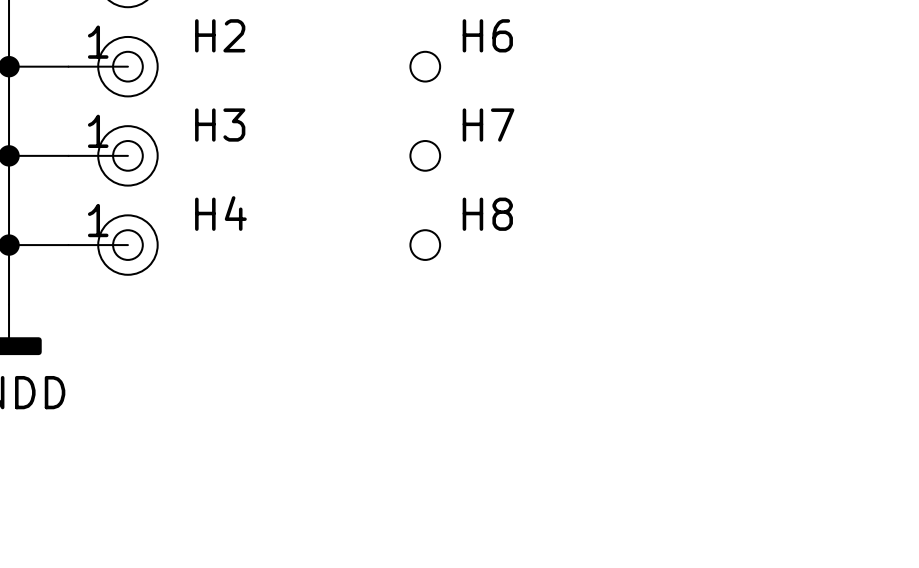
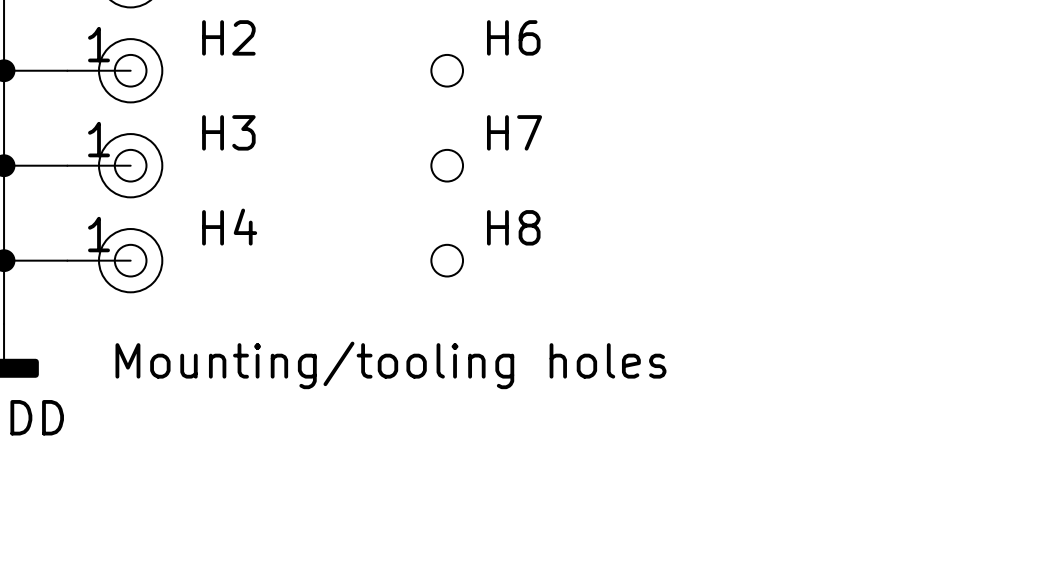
text: none -> Mounting/tooling holes (390, 365)

